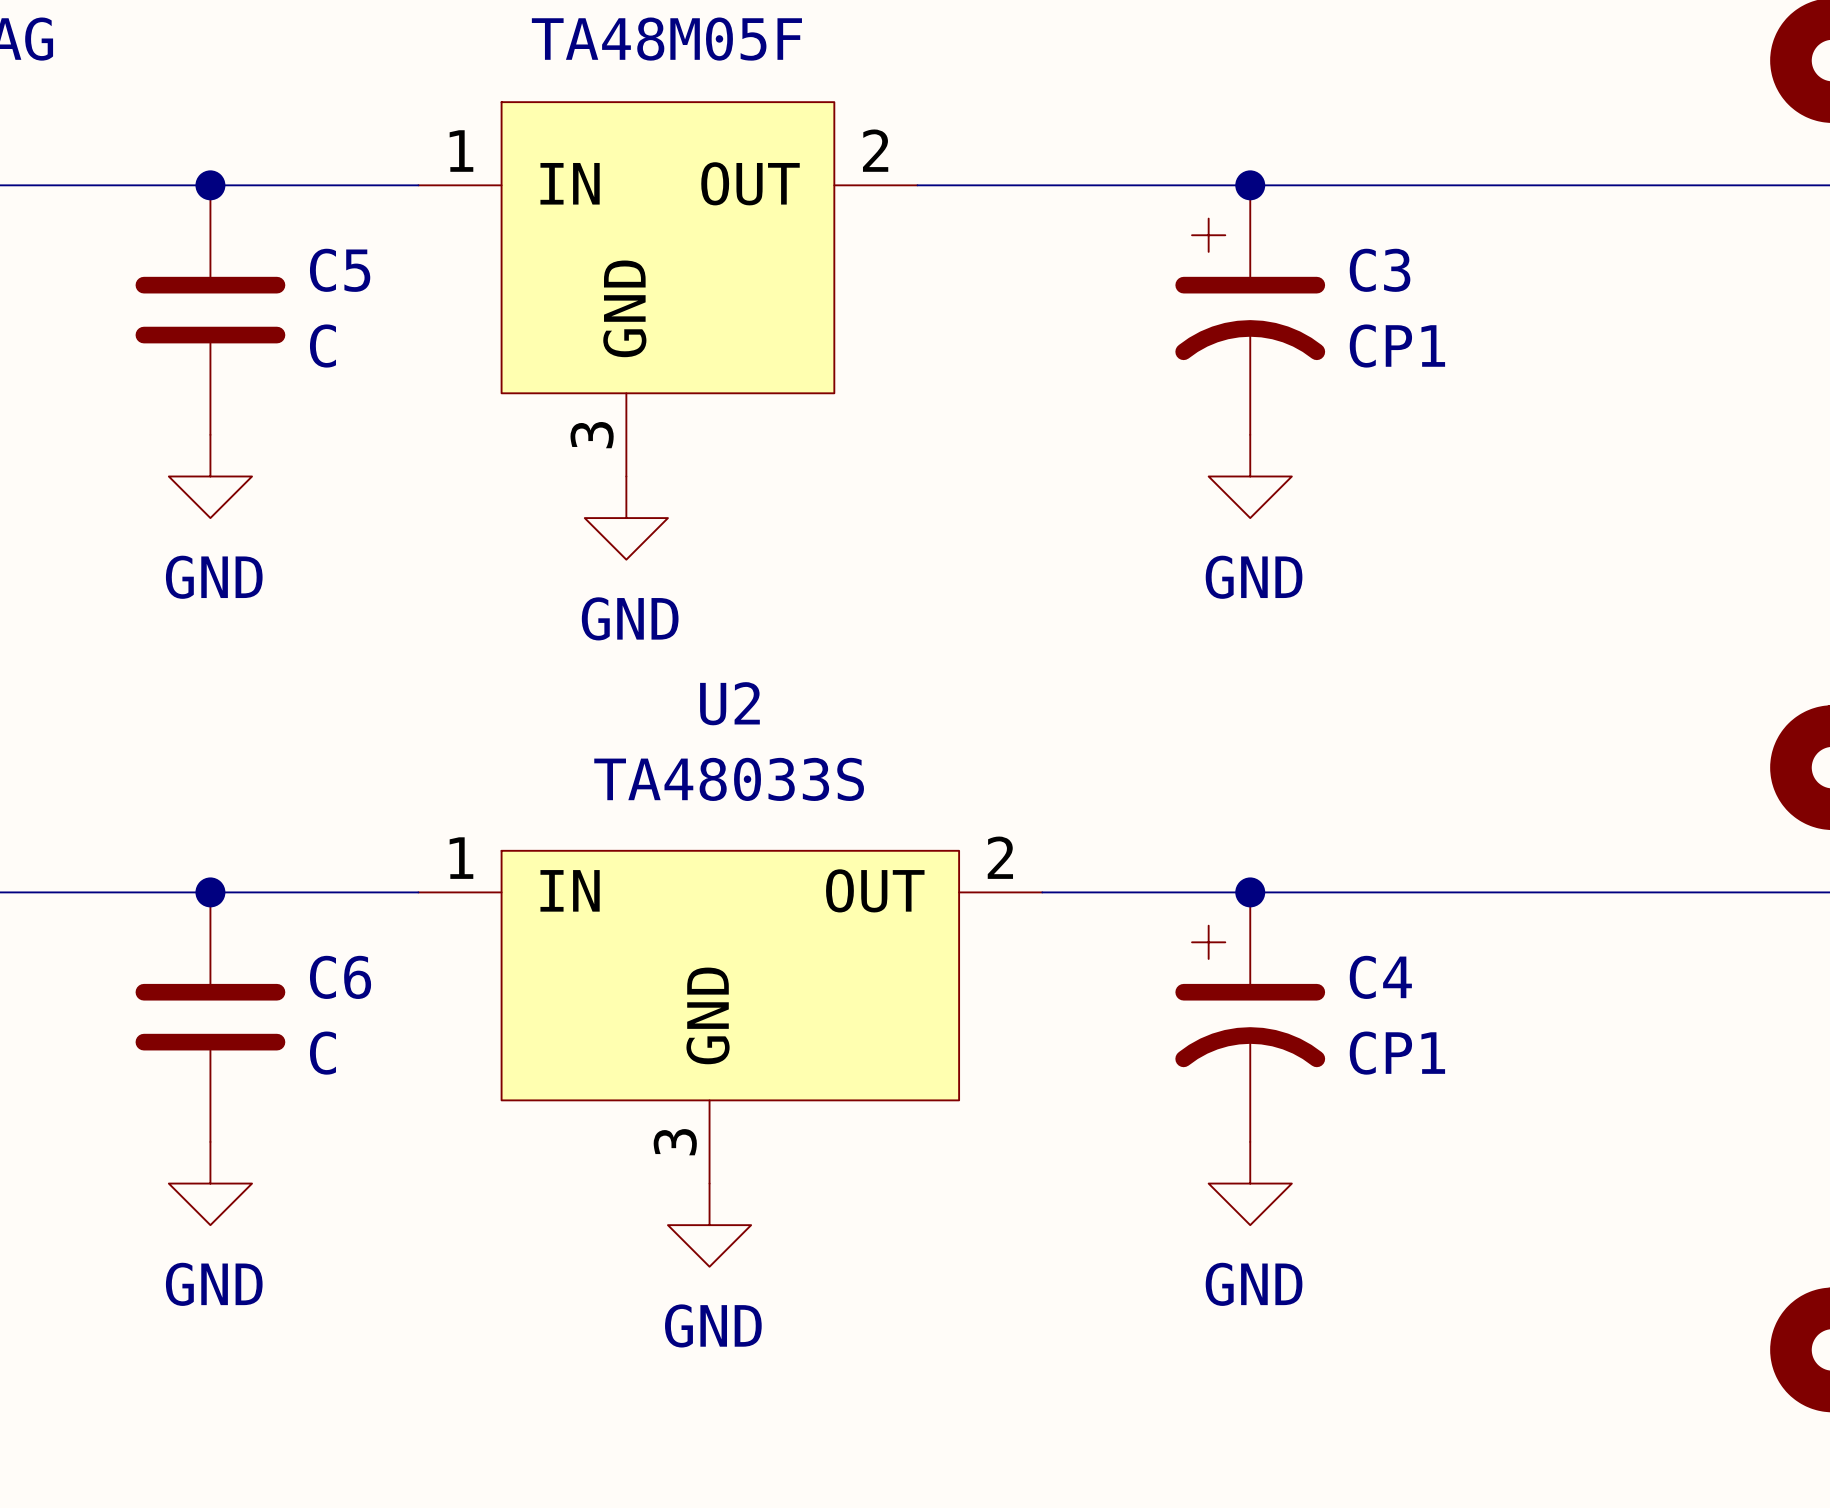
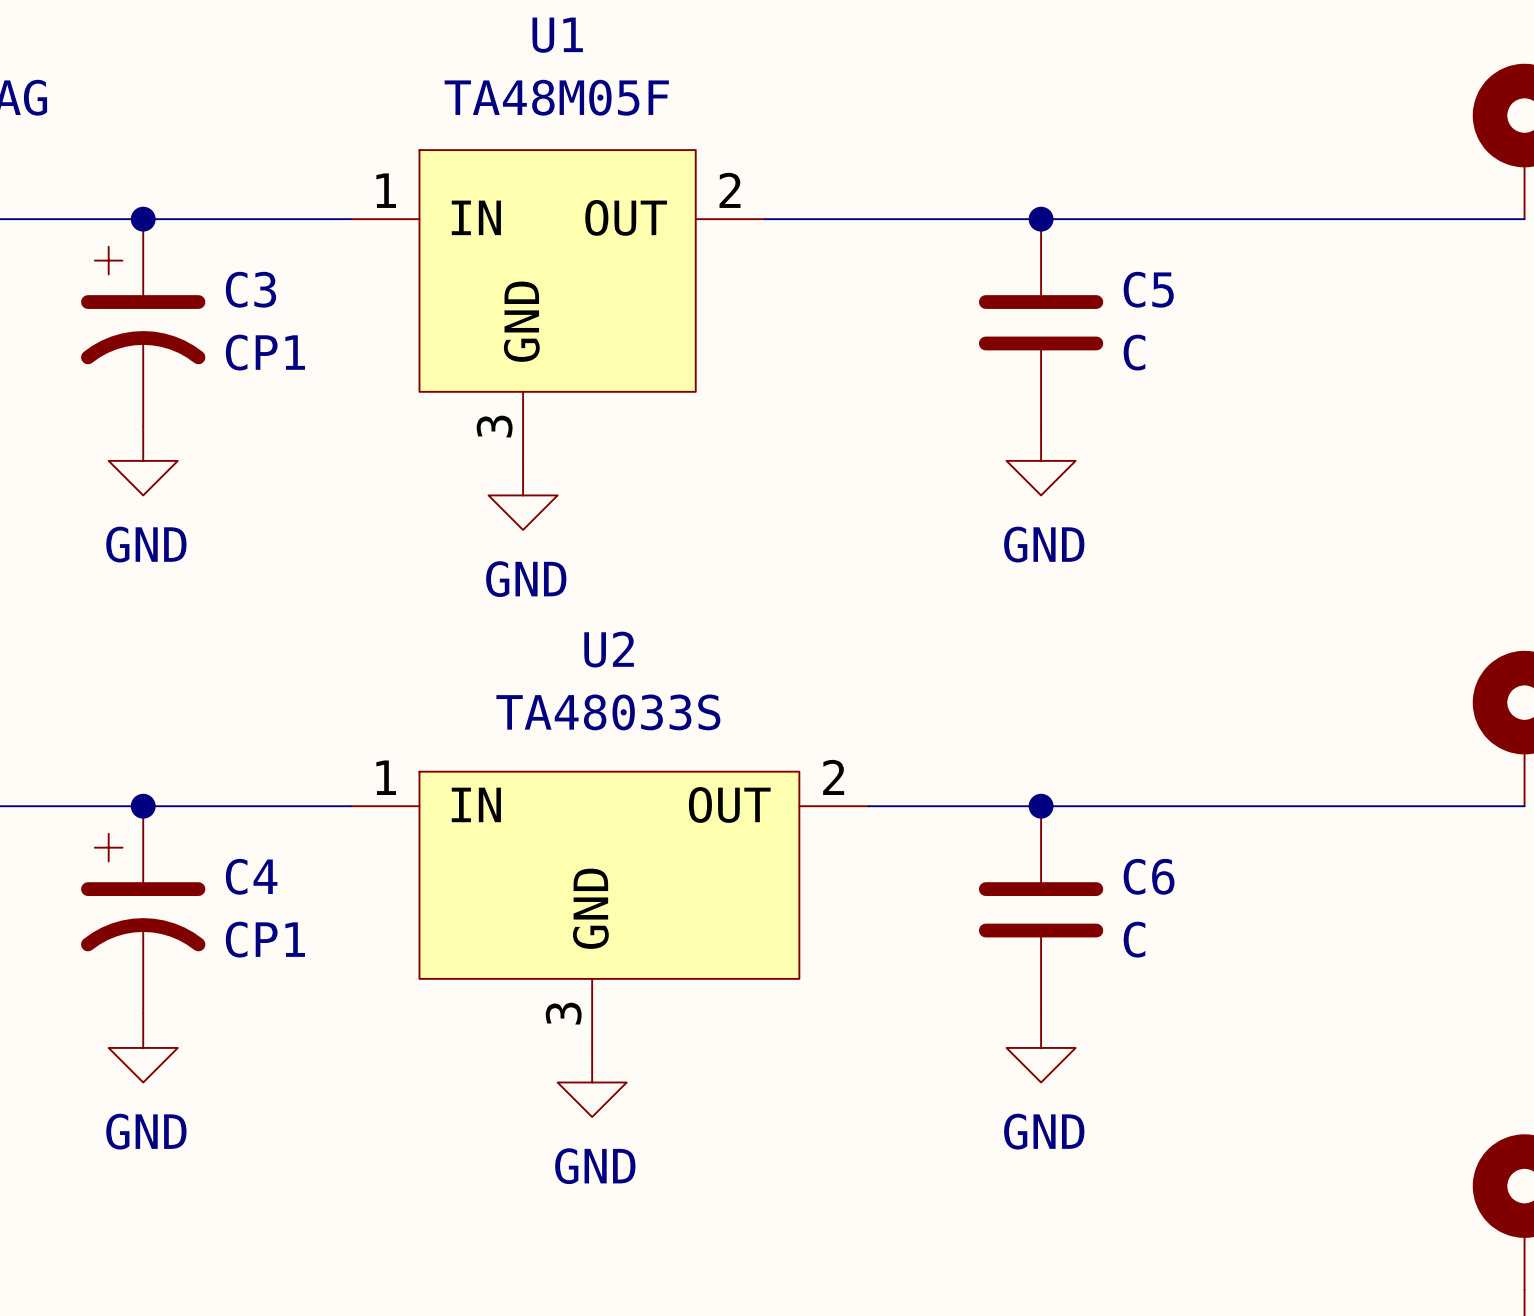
junction position: (210, 185) -> (143, 219)
C5 position: (210, 310) -> (1041, 322)
C3 position: (1250, 310) -> (143, 322)
power symbol position: GND (210, 476) -> GND (143, 460)
junction position: (210, 892) -> (143, 806)
C6 position: (210, 1017) -> (1041, 909)
C4 position: (1250, 1017) -> (143, 909)
power symbol position: GND (210, 1183) -> GND (143, 1047)

